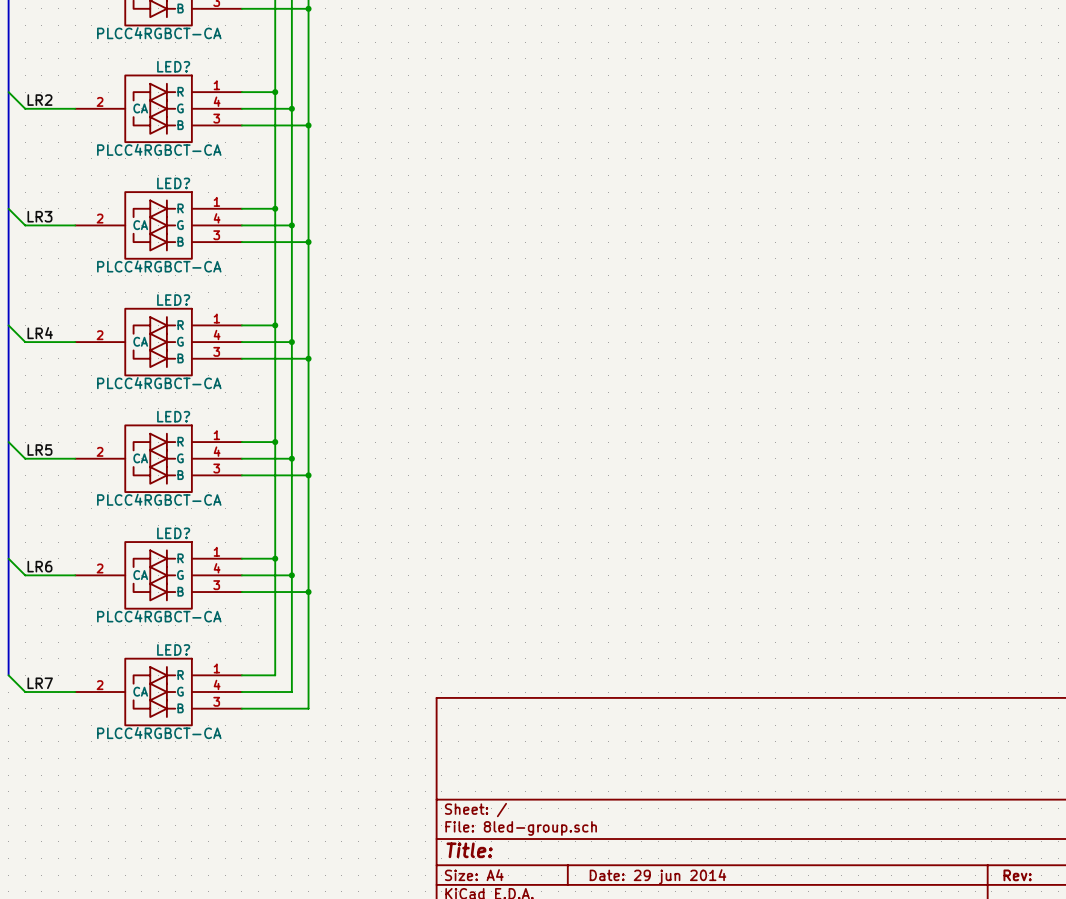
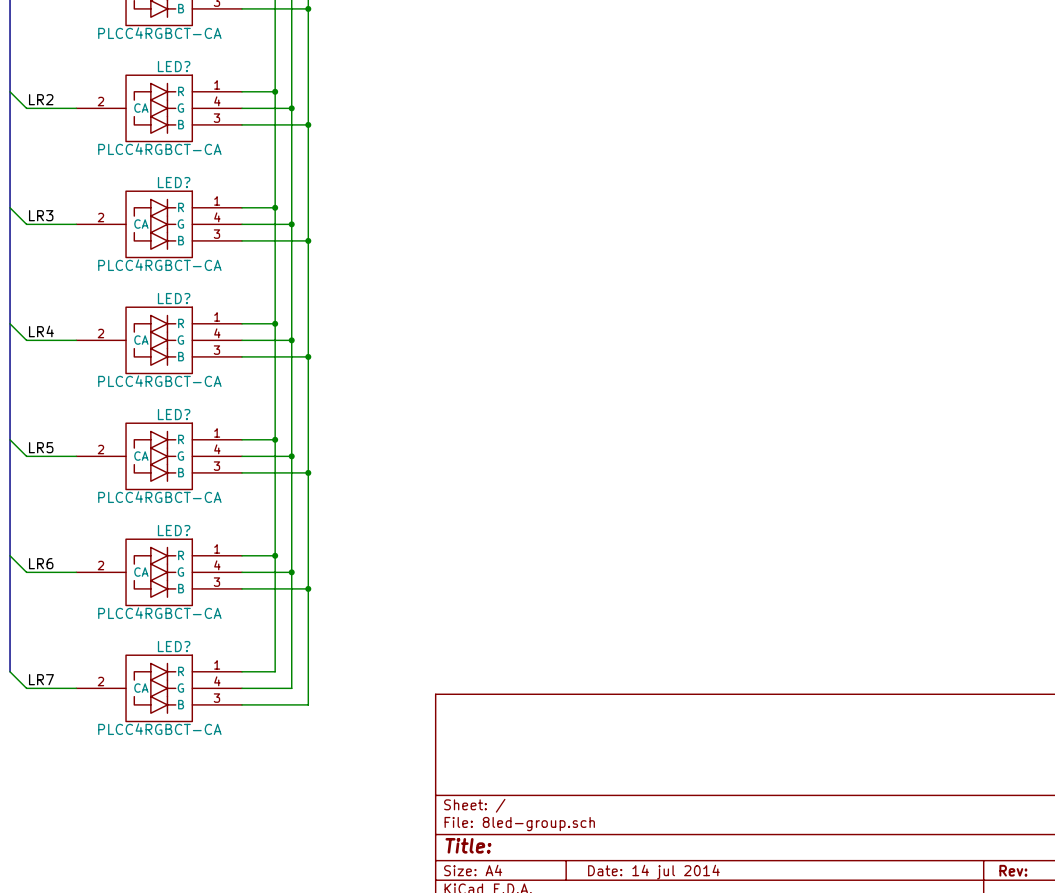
title block: Date: 29 jun 2014 (657, 876) -> Date: 14 jul 2014 (653, 872)

